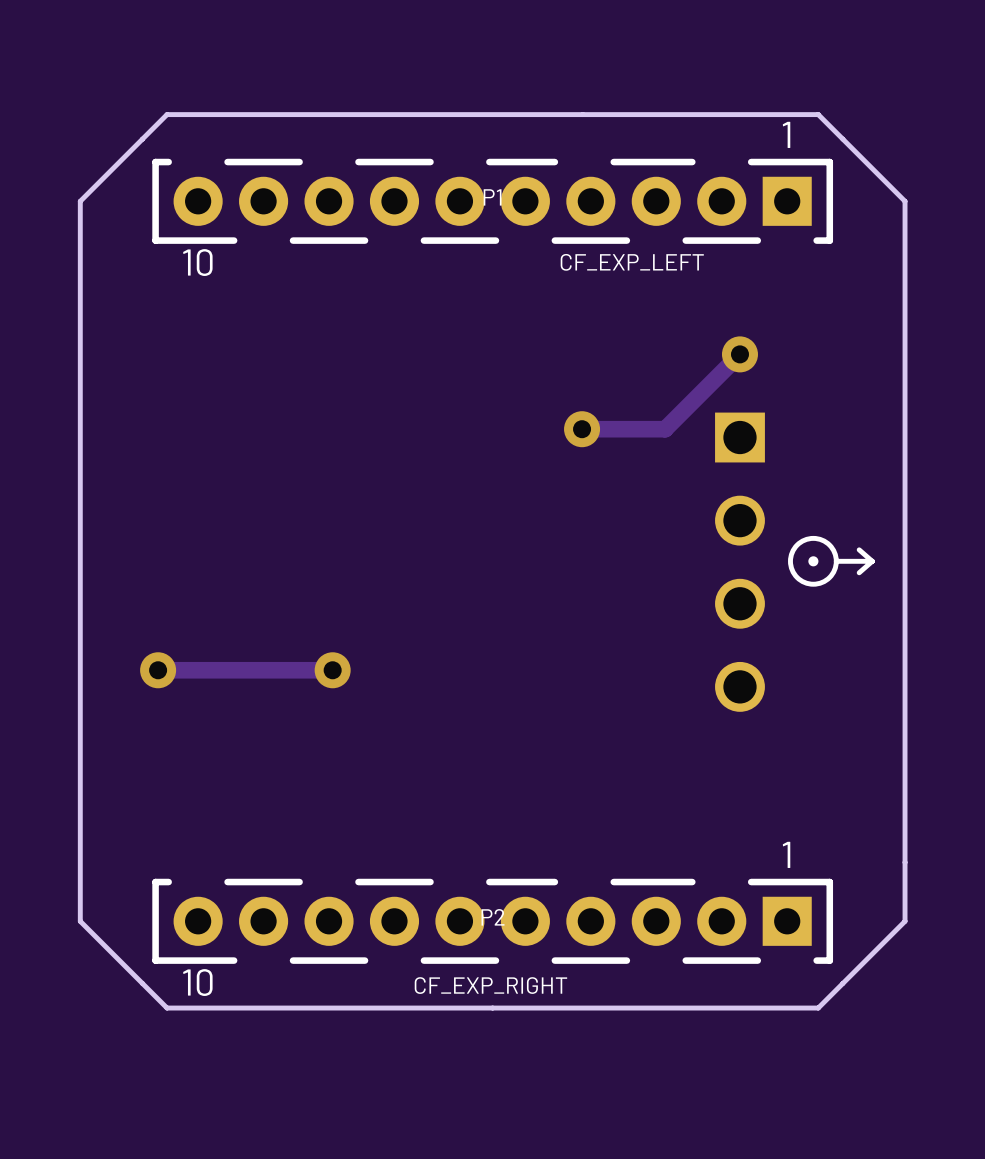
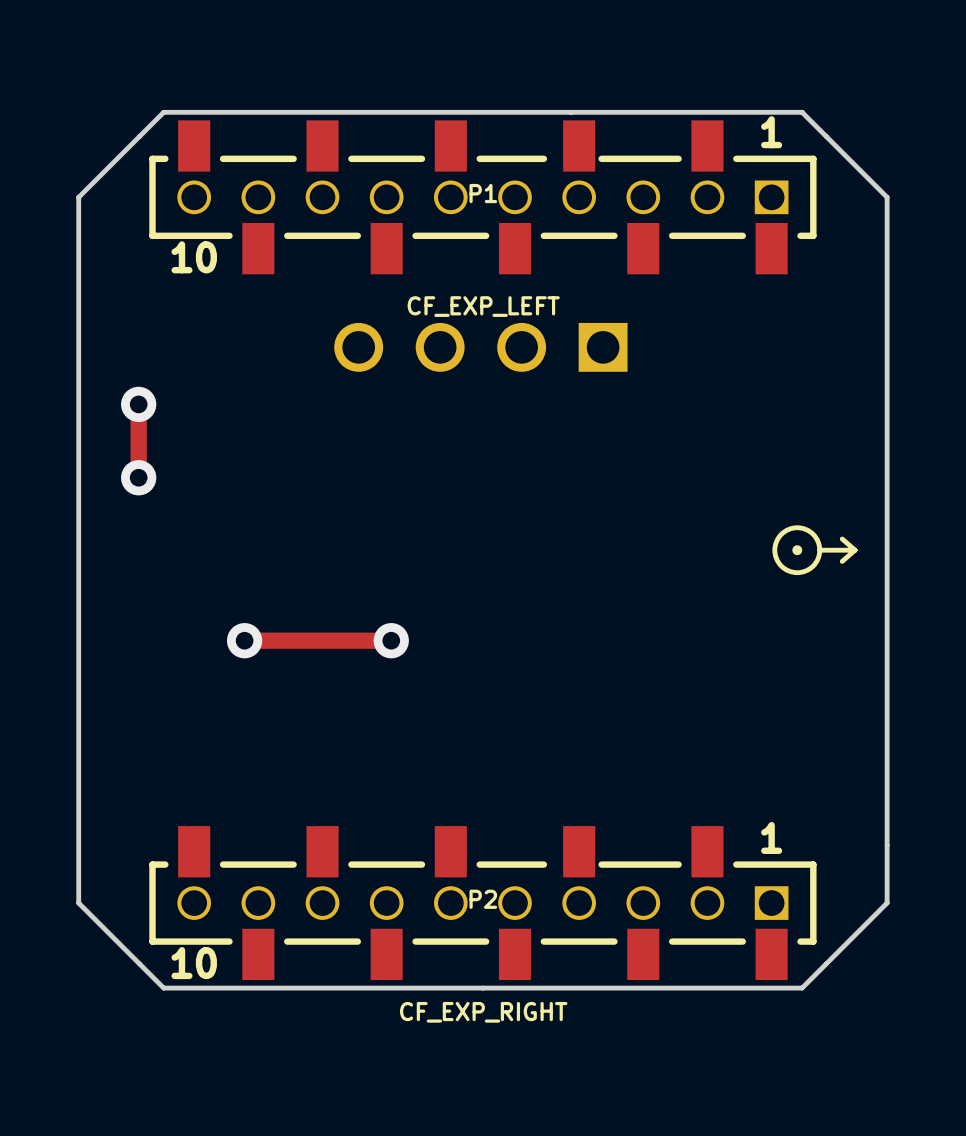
P1 footprint: [152, 158, 834, 244] -> [149, 120, 817, 275]
P1 value position: CF_EXP_LEFT (632, 262) -> CF_EXP_LEFT (483, 306)
track: (739, 354) (665, 429) (582, 429) -> none
via: (739, 354) -> none
track: none -> (138, 404) (138, 477)
via: none -> (138, 404)
via: (582, 429) -> none
via: none -> (138, 477)
part rotation: 0° (739, 562) -> 90° clockwise (480, 347)
part position: (739, 562) -> (480, 347)
track: none -> (244, 640) (391, 640)
via: none -> (244, 640)
via: none -> (391, 640)
track: (158, 670) (332, 670) -> none
via: (158, 670) -> none
via: (332, 670) -> none
P2 footprint: [152, 878, 834, 964] -> [149, 826, 817, 981]

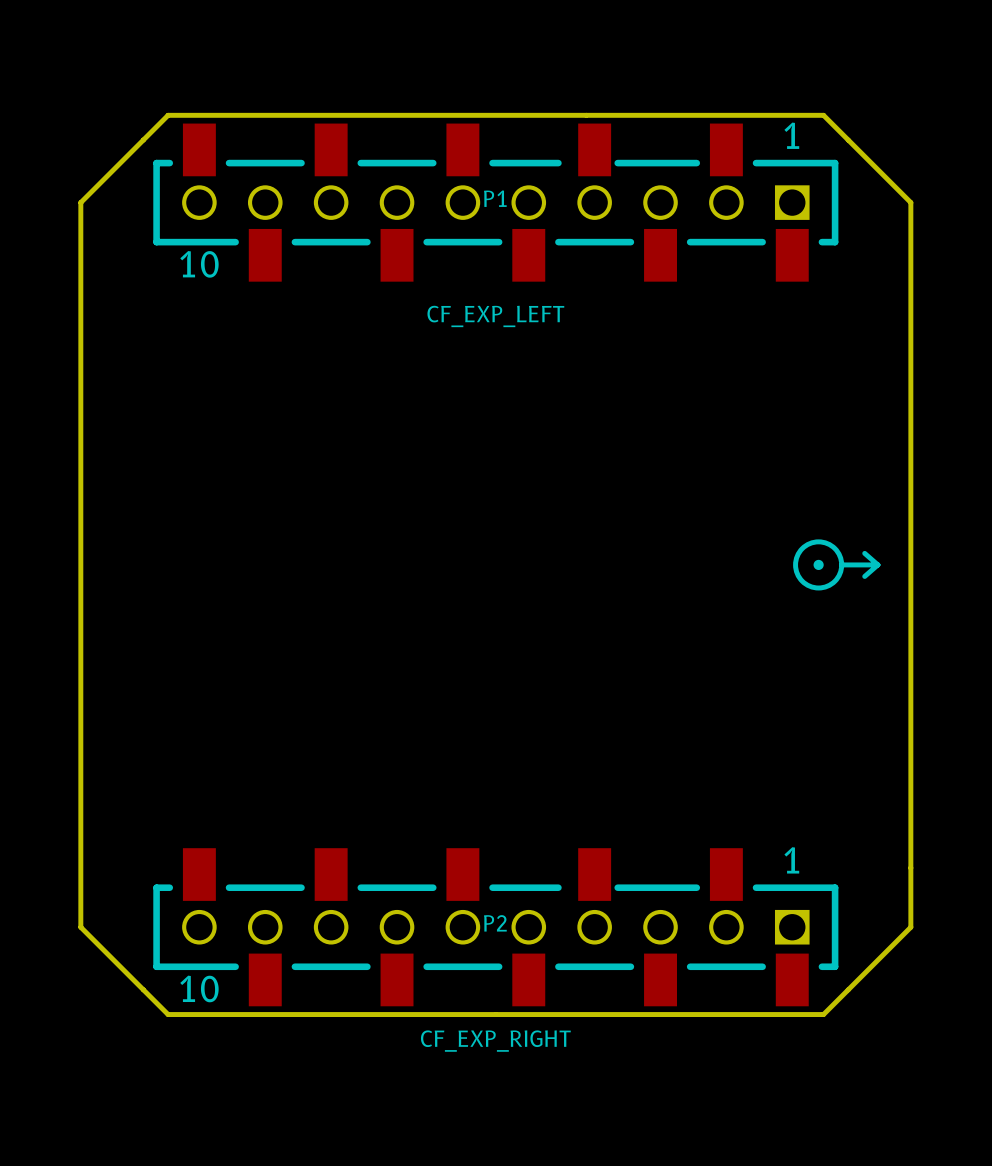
part: (480, 347) -> none
track: (138, 404) (138, 477) -> none
via: (138, 404) -> none
via: (138, 477) -> none
track: (244, 640) (391, 640) -> none
via: (244, 640) -> none
via: (391, 640) -> none

